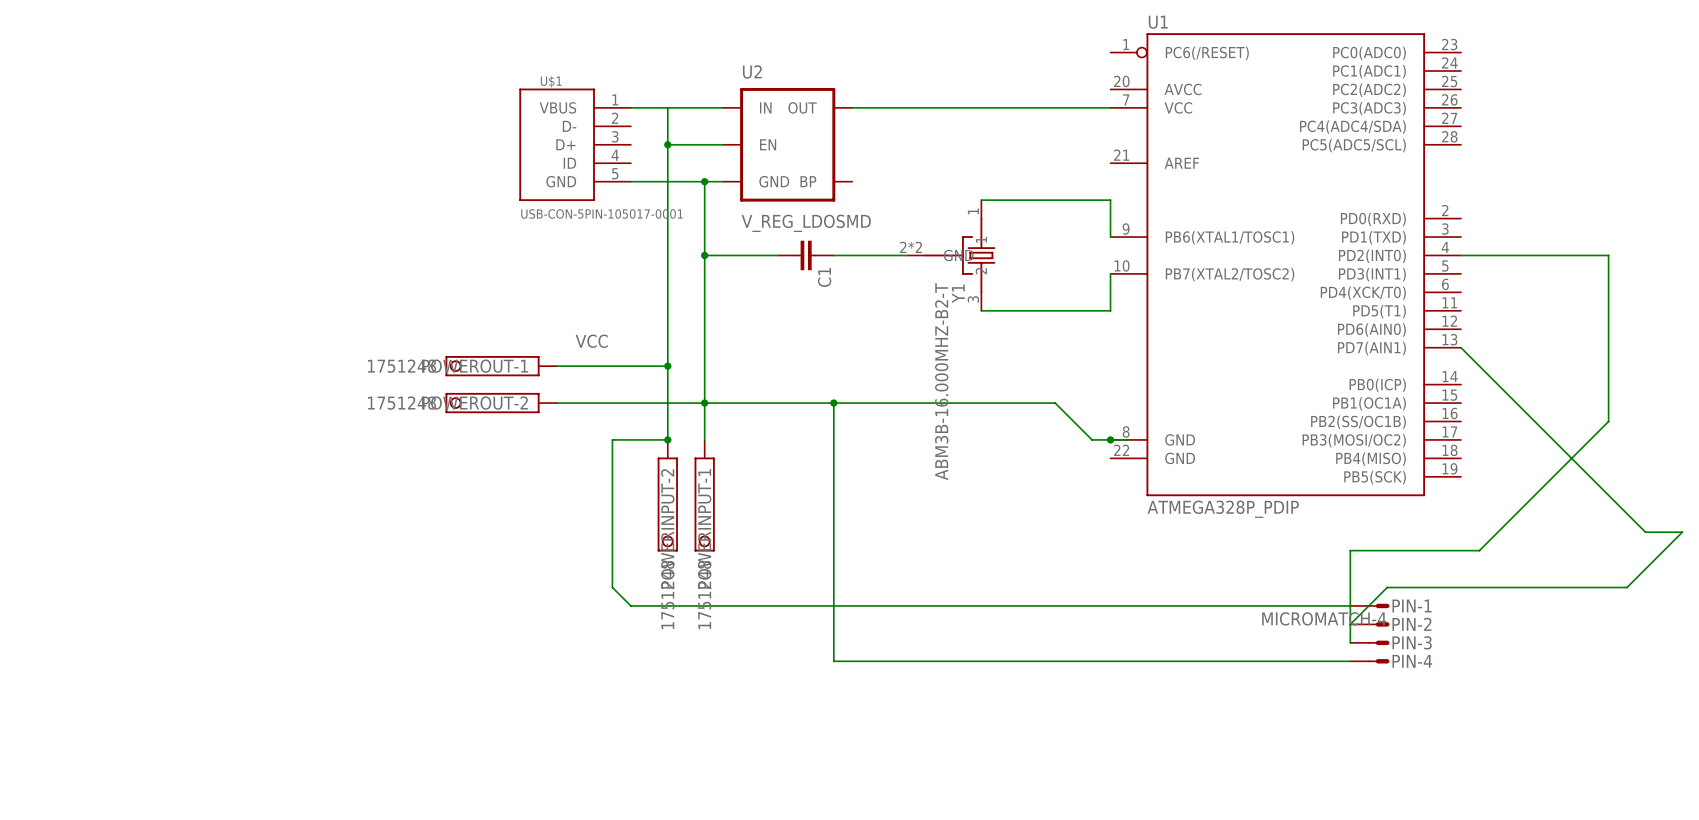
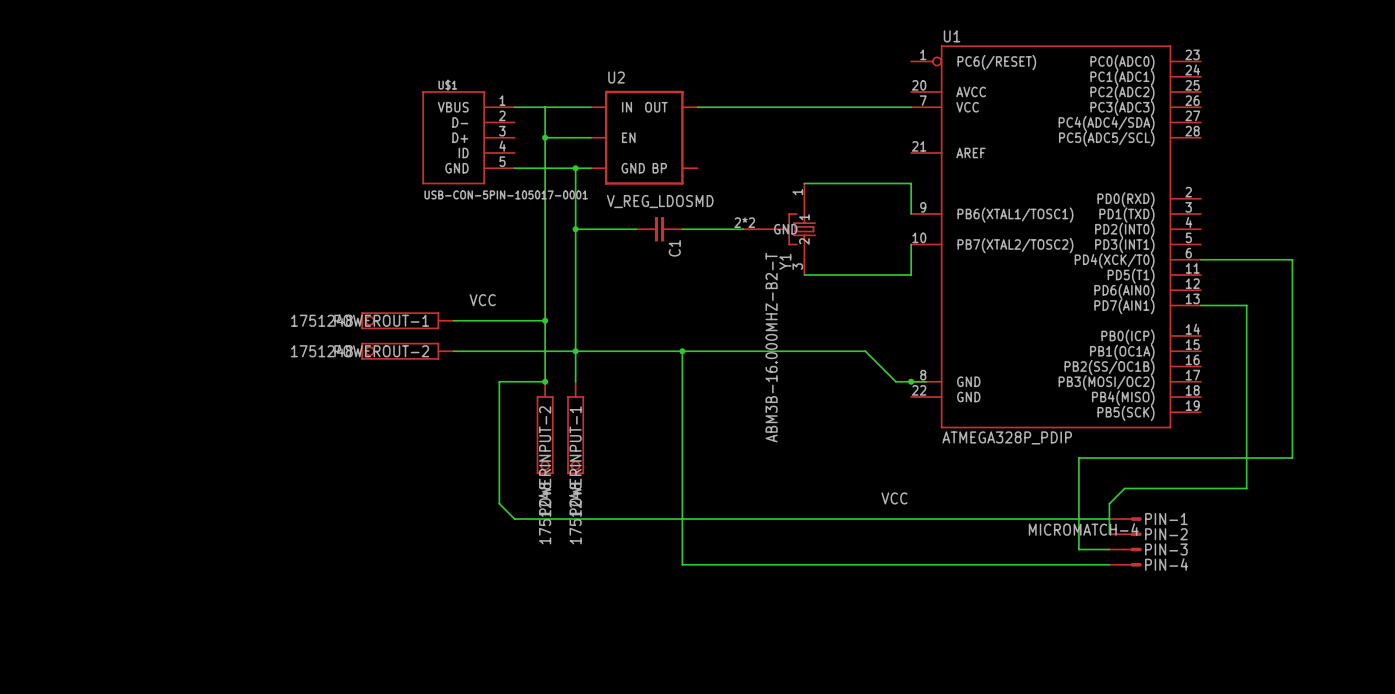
wire: (1461, 255) (1608, 255) (1608, 421) (1479, 550) (1350, 550) (1350, 587) -> none
wire: none -> (1200, 259) (1292, 259) (1292, 458) (1078, 458) (1078, 549) (1109, 549)
wire: (1461, 347) (1645, 532) (1682, 532) (1627, 587) (1387, 587) (1350, 624) (1350, 642) -> (1200, 305) (1246, 305) (1246, 488) (1124, 488) (1109, 503)
label: none -> VCC (894, 498)

